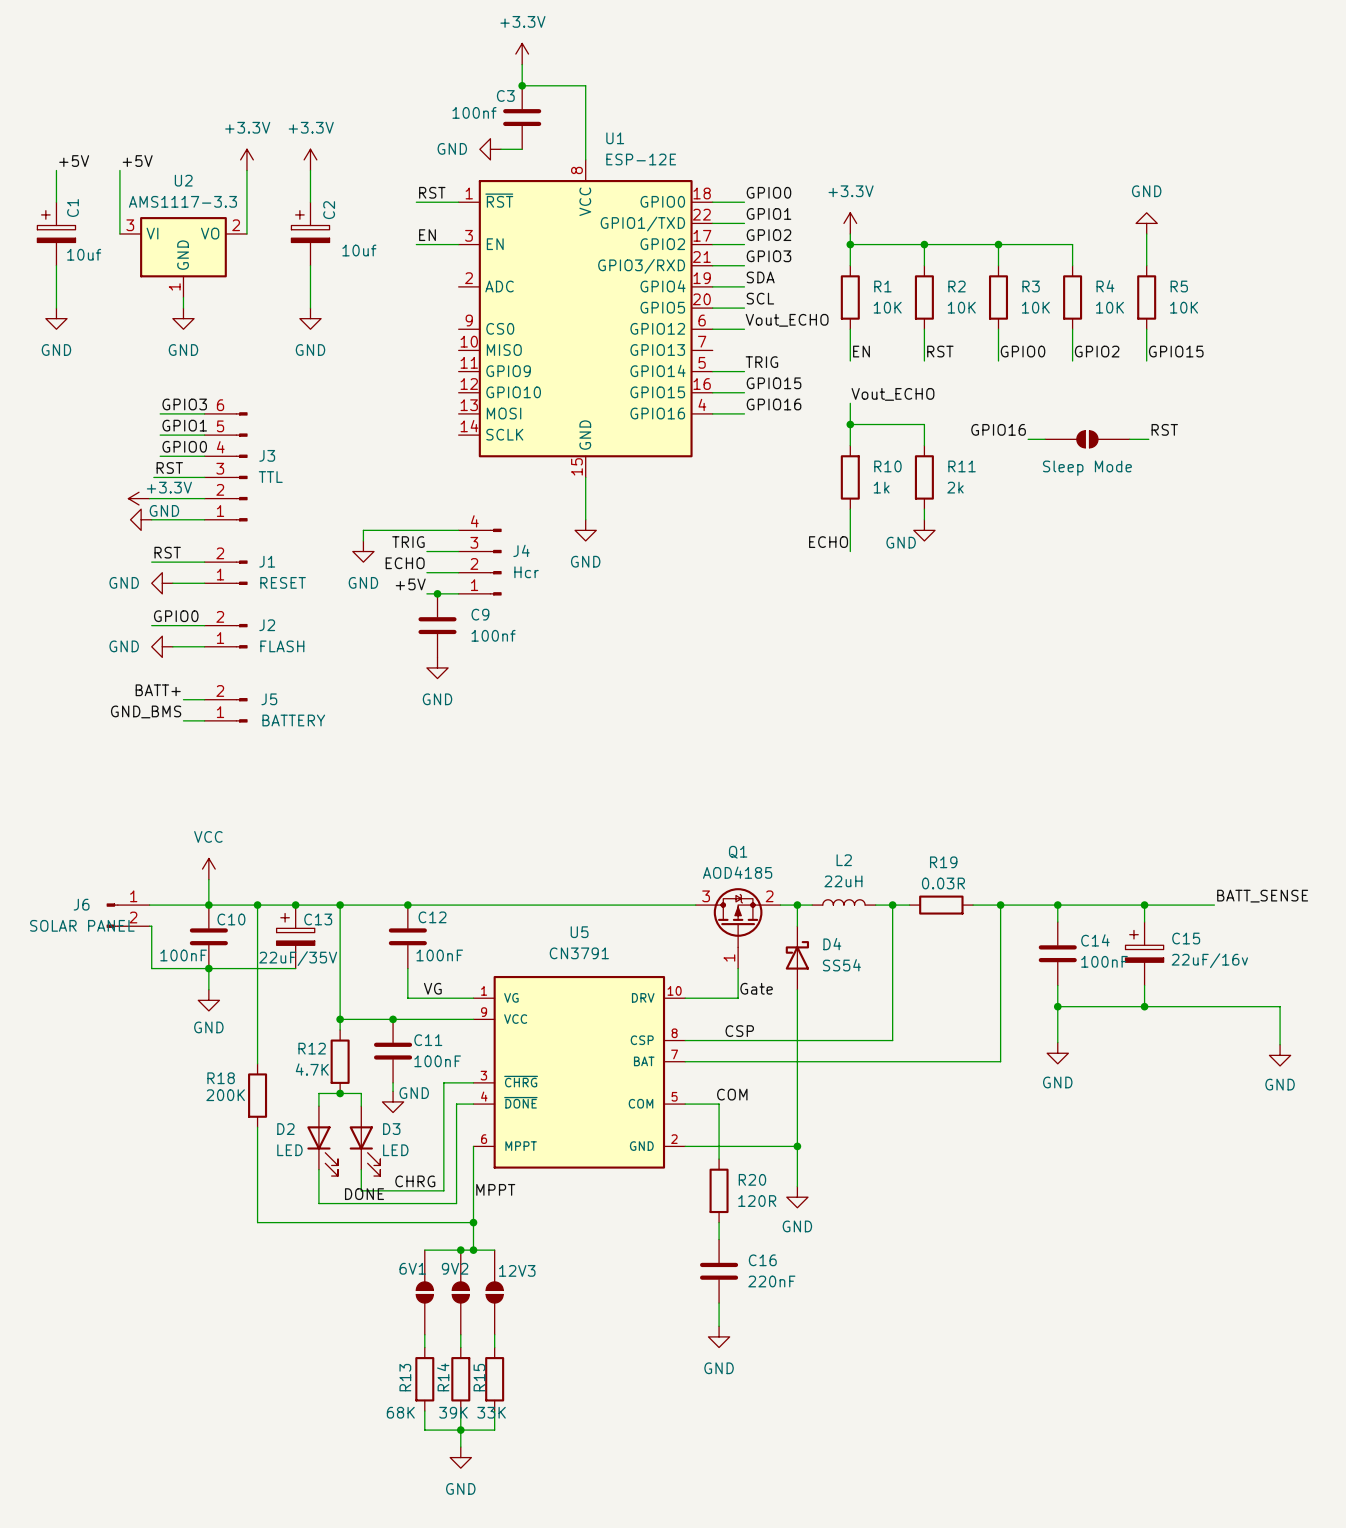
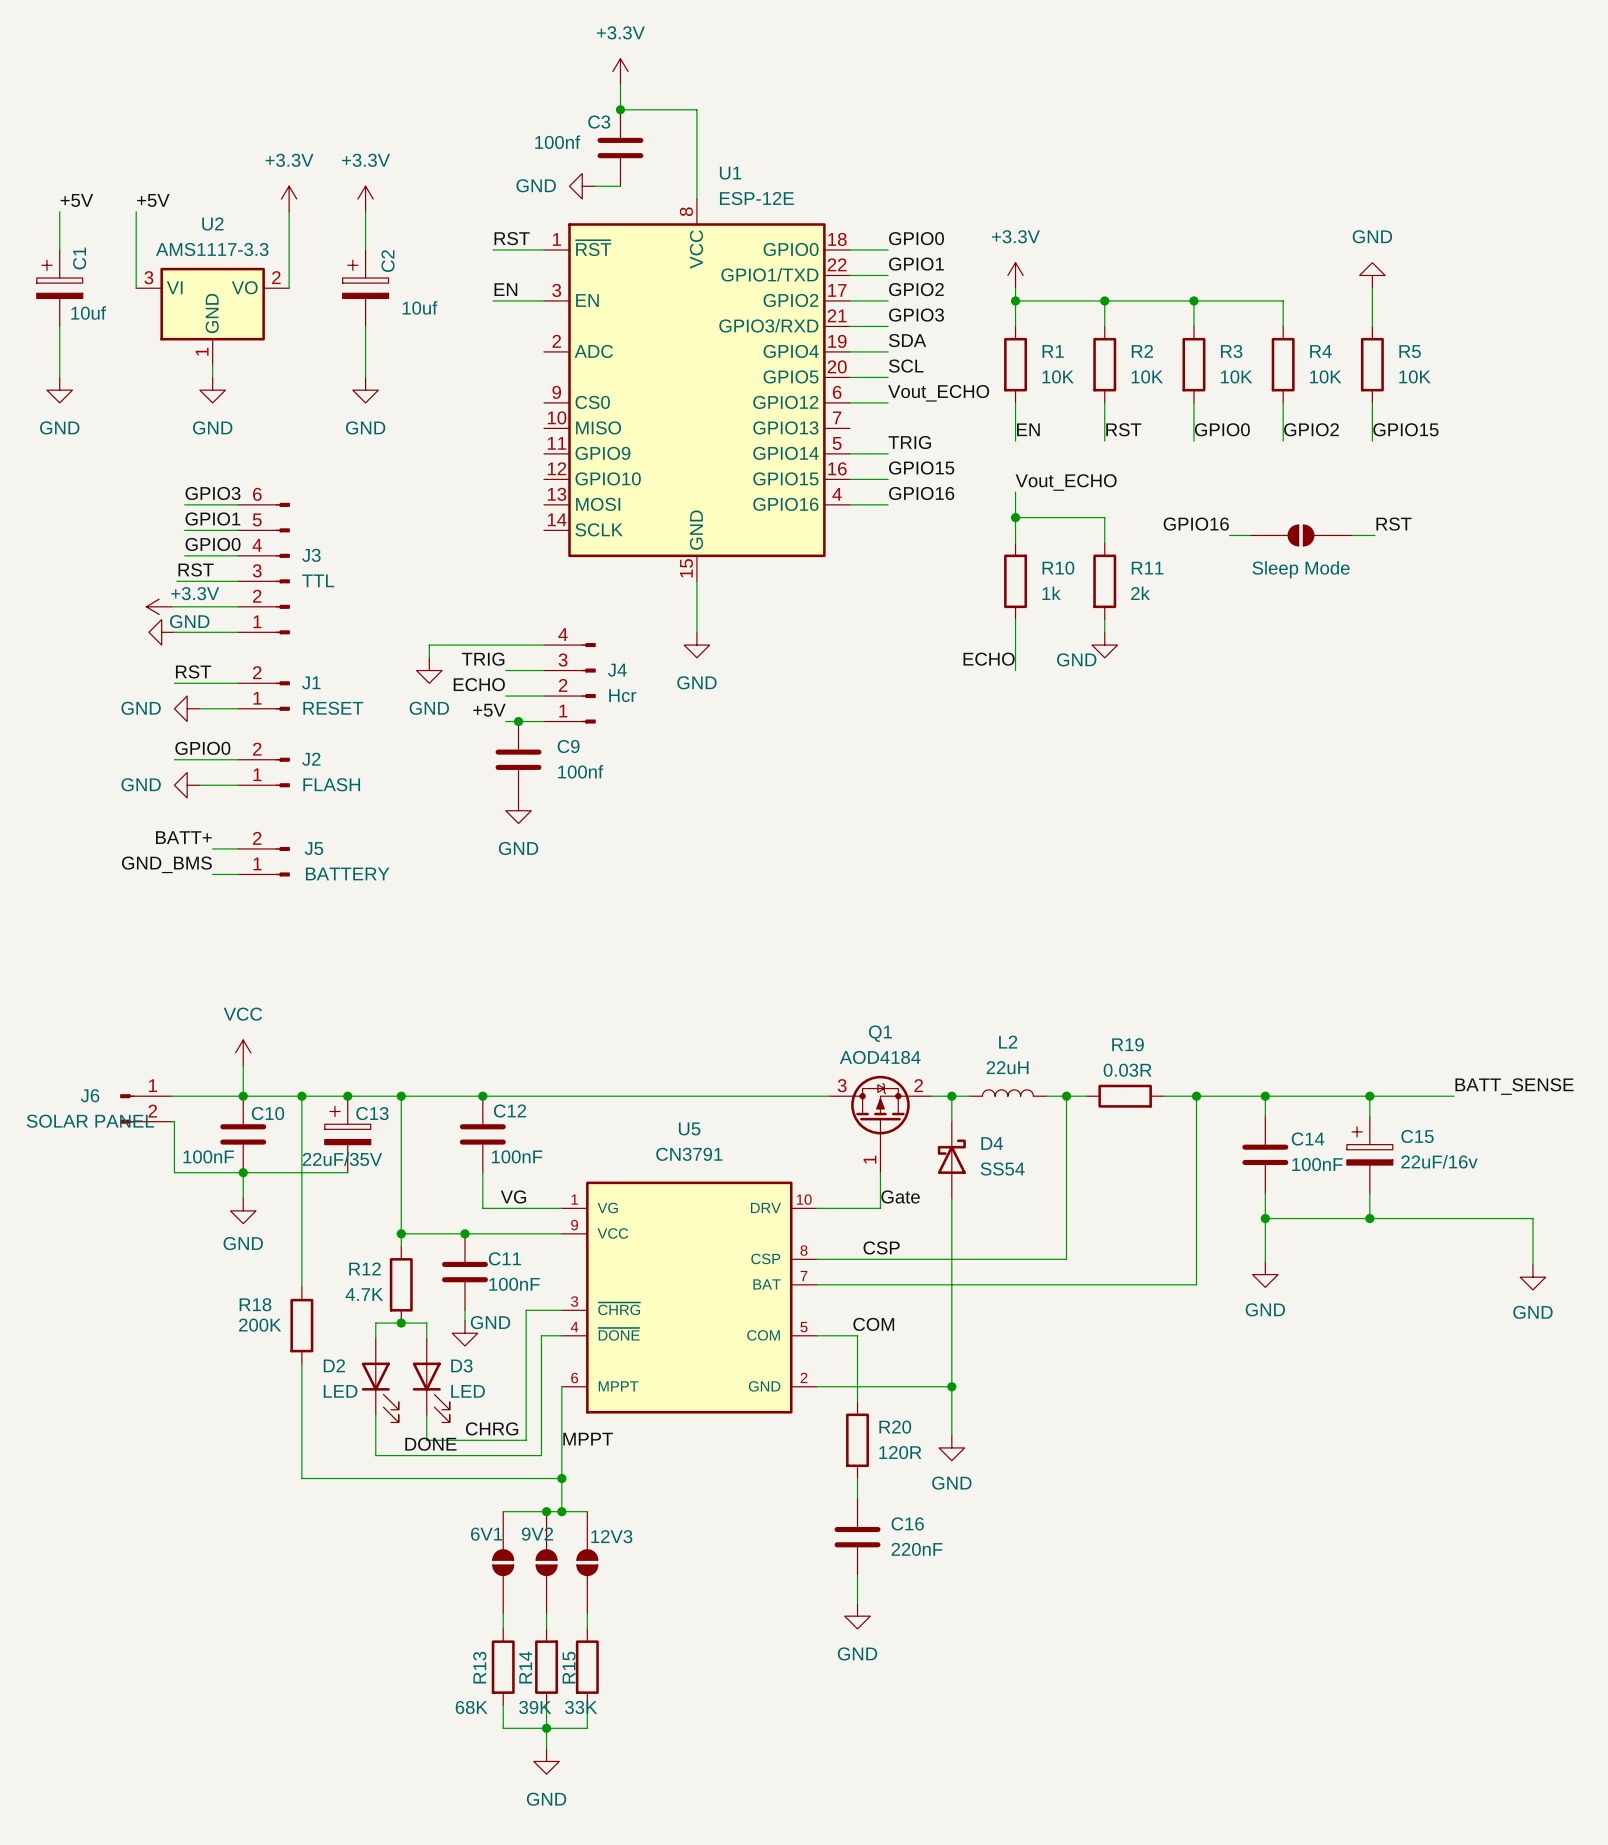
Q1 value: AOD4185 (737, 872) -> AOD4184 (880, 1057)

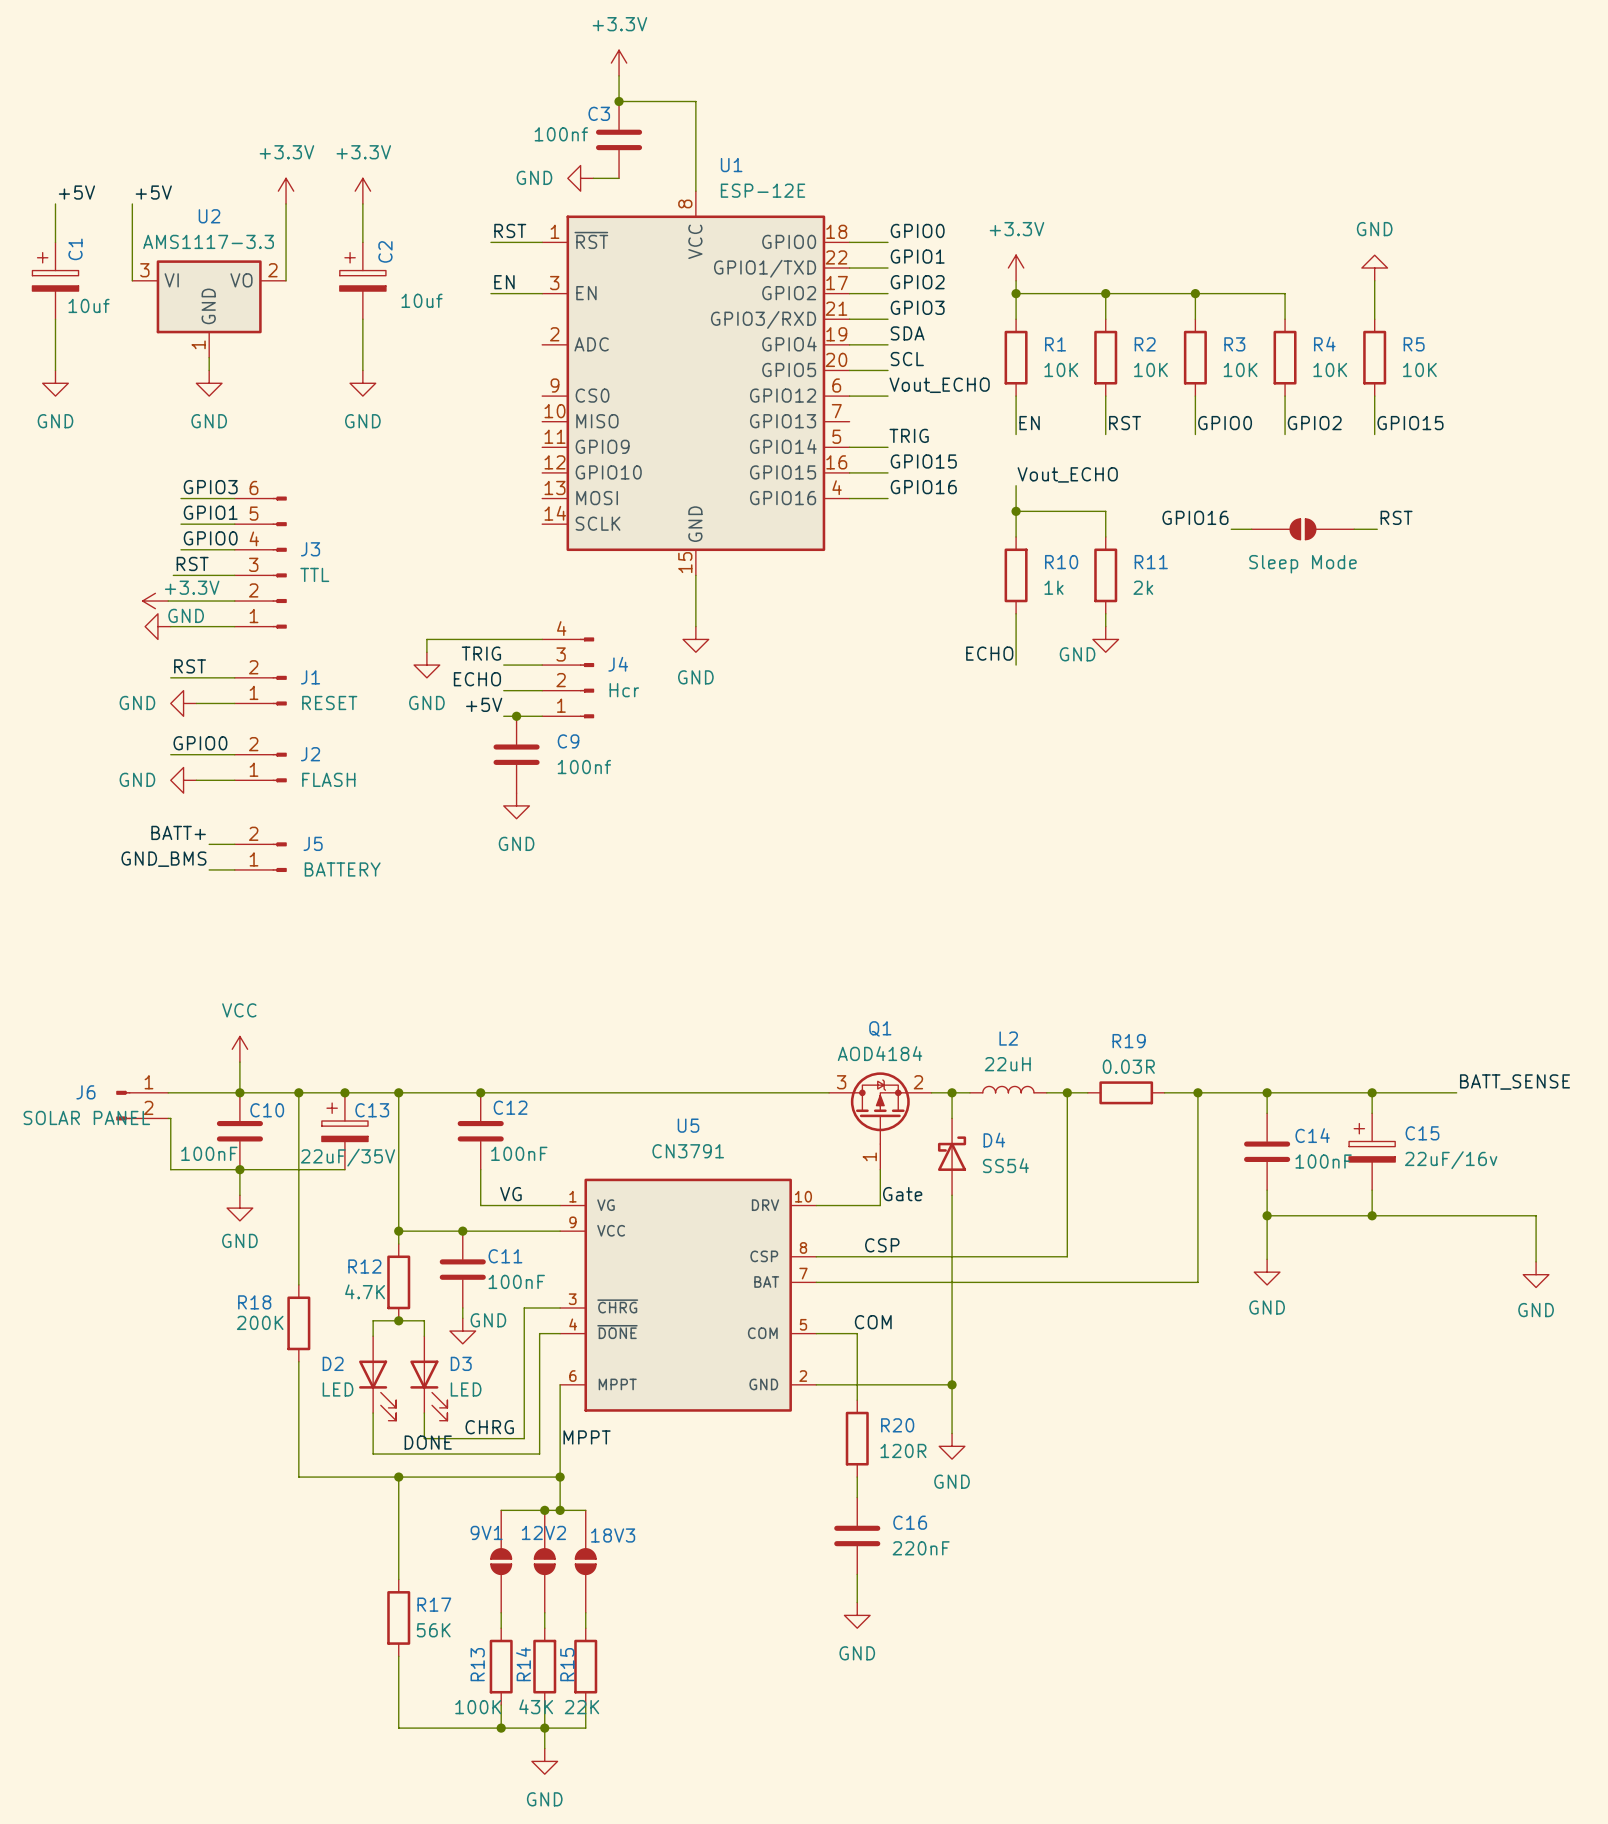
wire: none -> (398, 1477) (398, 1579)
junction: none -> (398, 1477)
6V1 name: 6V1 (486, 1534) -> 9V1 (486, 1532)
9V2 name: 9V2 (537, 1534) -> 12V2 (543, 1532)
12V3 name: 12V3 (611, 1536) -> 18V3 (613, 1535)
R17: none -> 56K (398, 1617)
wire: none -> (398, 1656) (398, 1728) (501, 1728)
R13 value: 68K (471, 1707) -> 100K (478, 1707)
R14 value: 39K (535, 1707) -> 43K (536, 1706)
R15 value: 33K (581, 1707) -> 22K (581, 1707)
junction: none -> (501, 1728)

